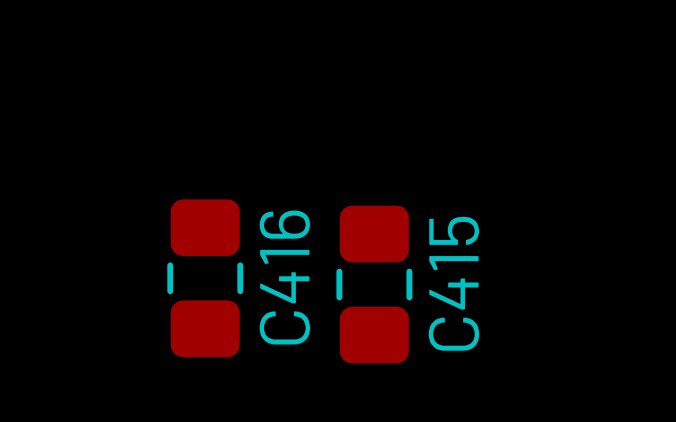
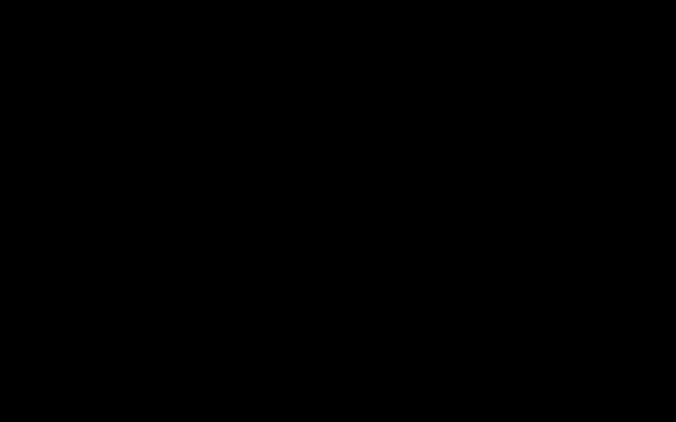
C416: (205, 278) -> none
C415: (374, 284) -> none

